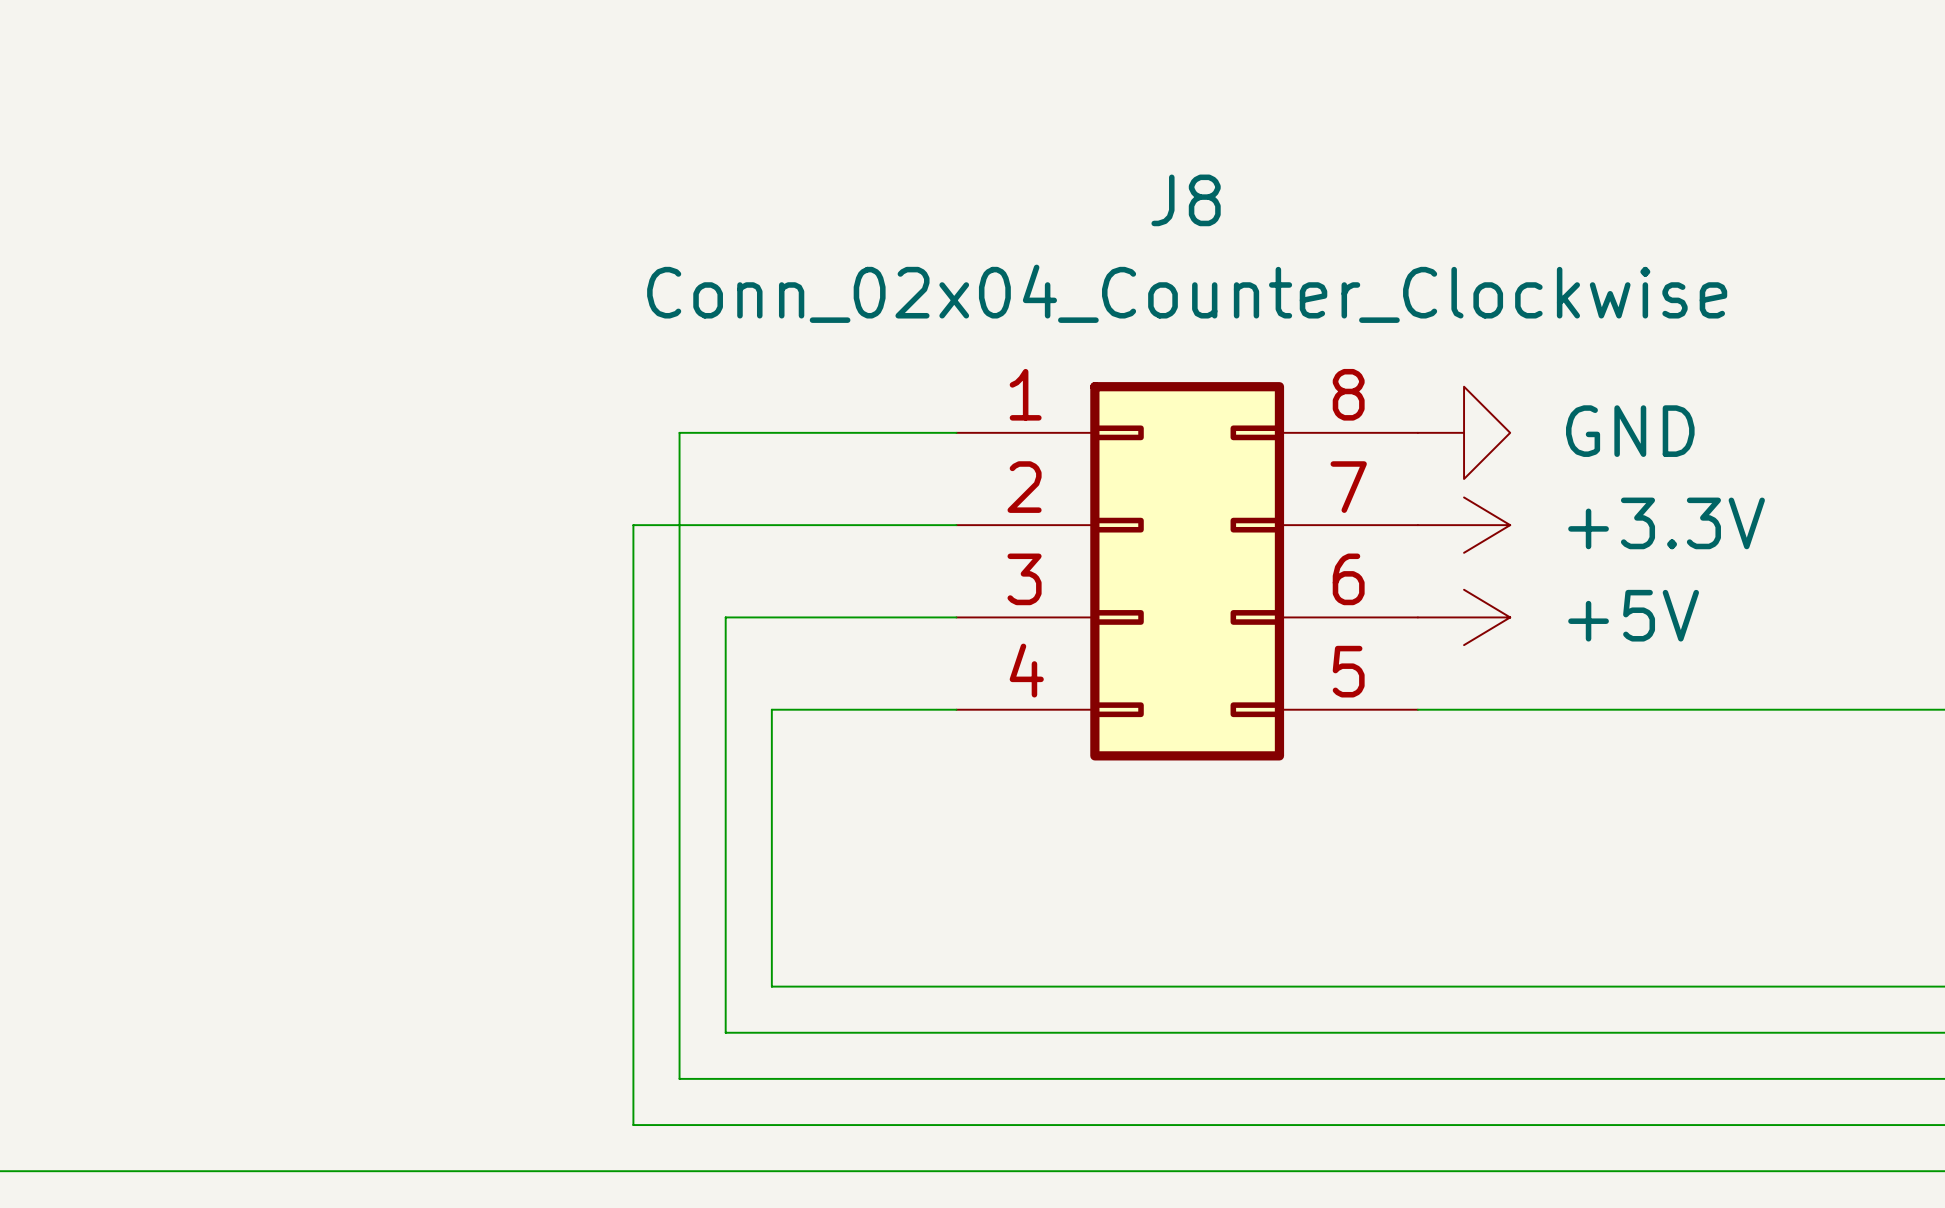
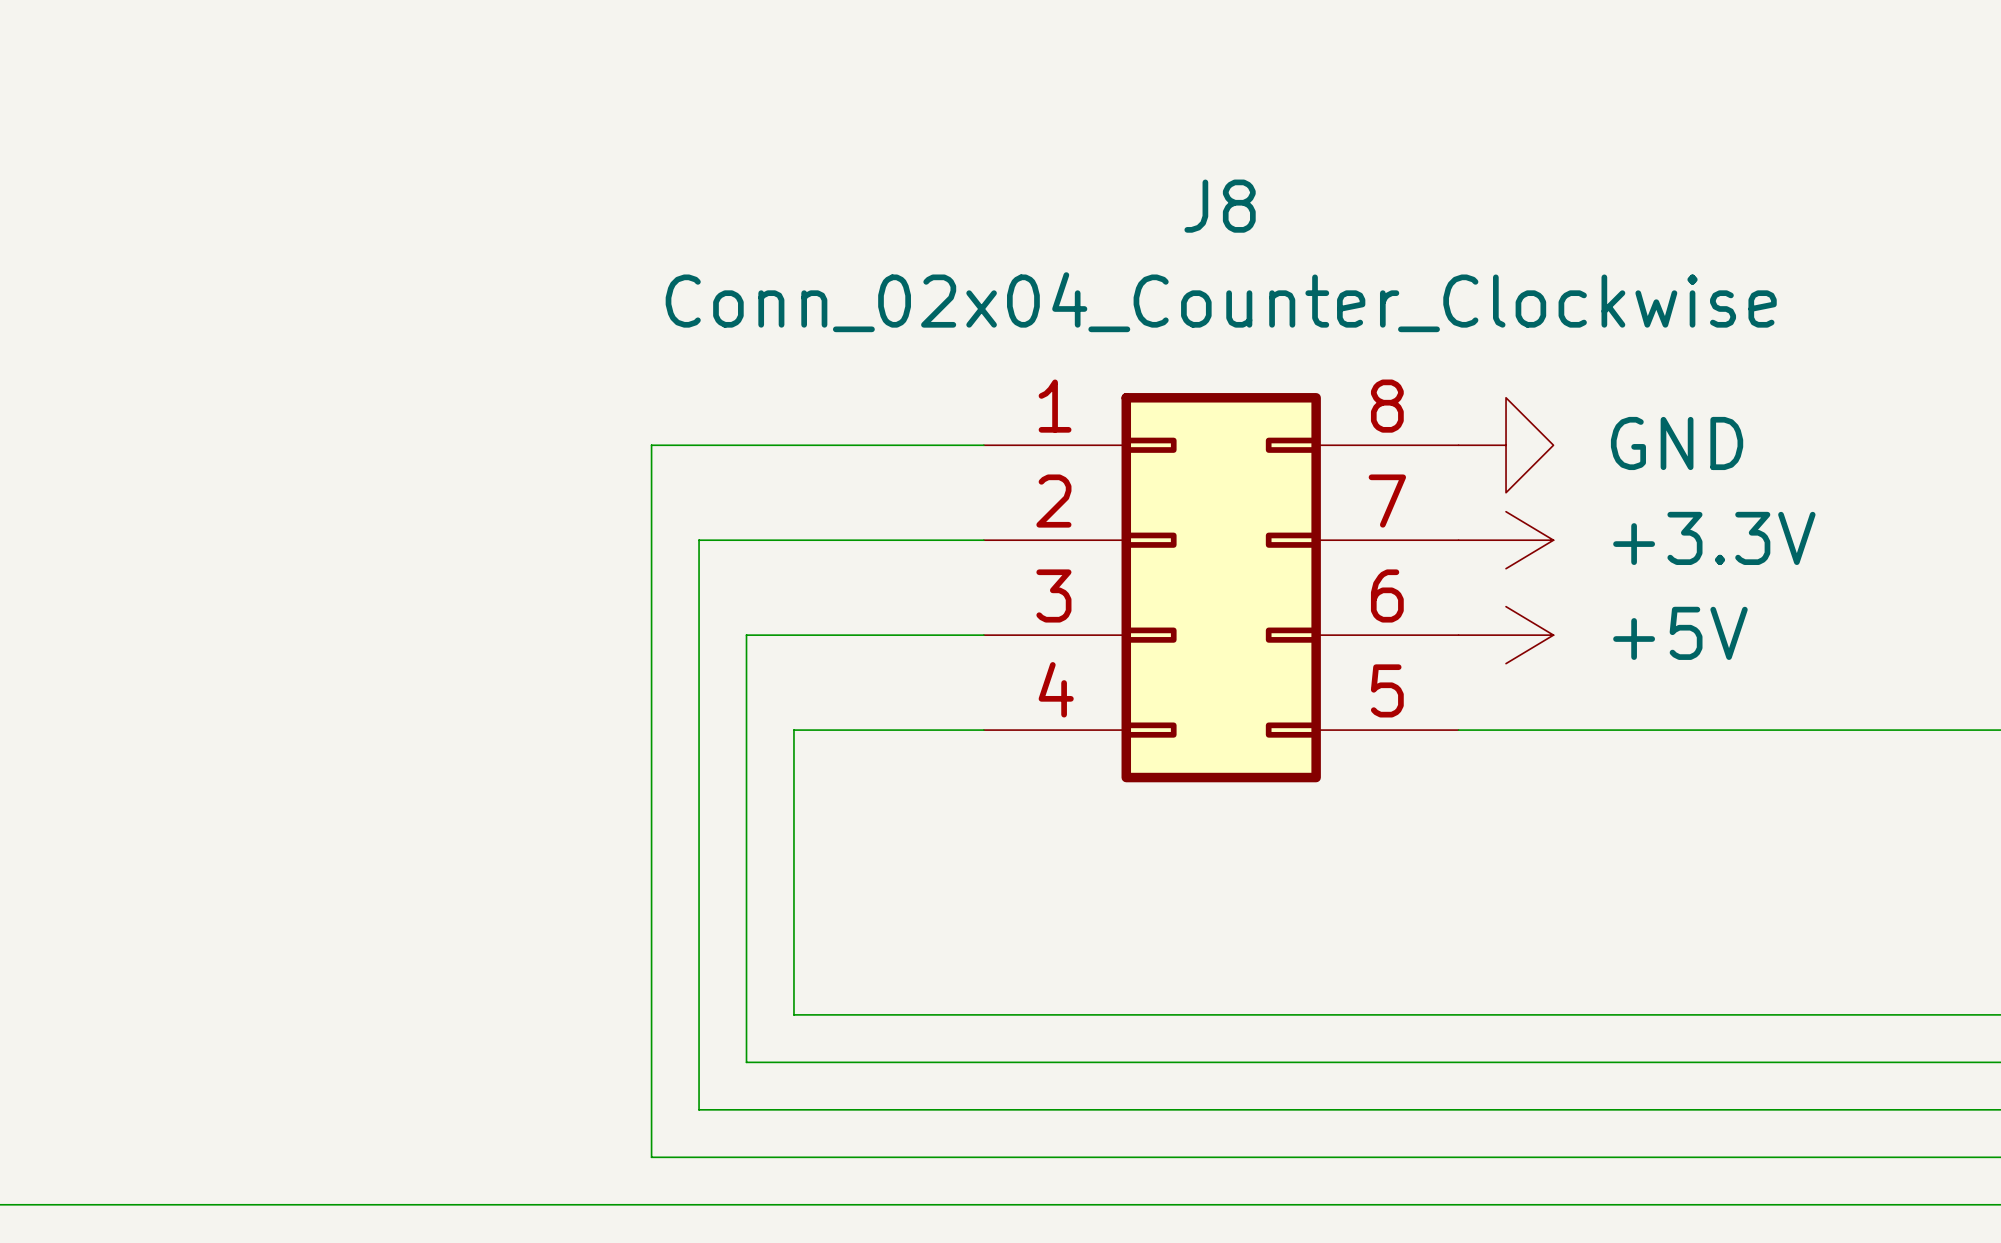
wire: (679, 432) (679, 525) (633, 525) -> (699, 445) (651, 445) (651, 540)

